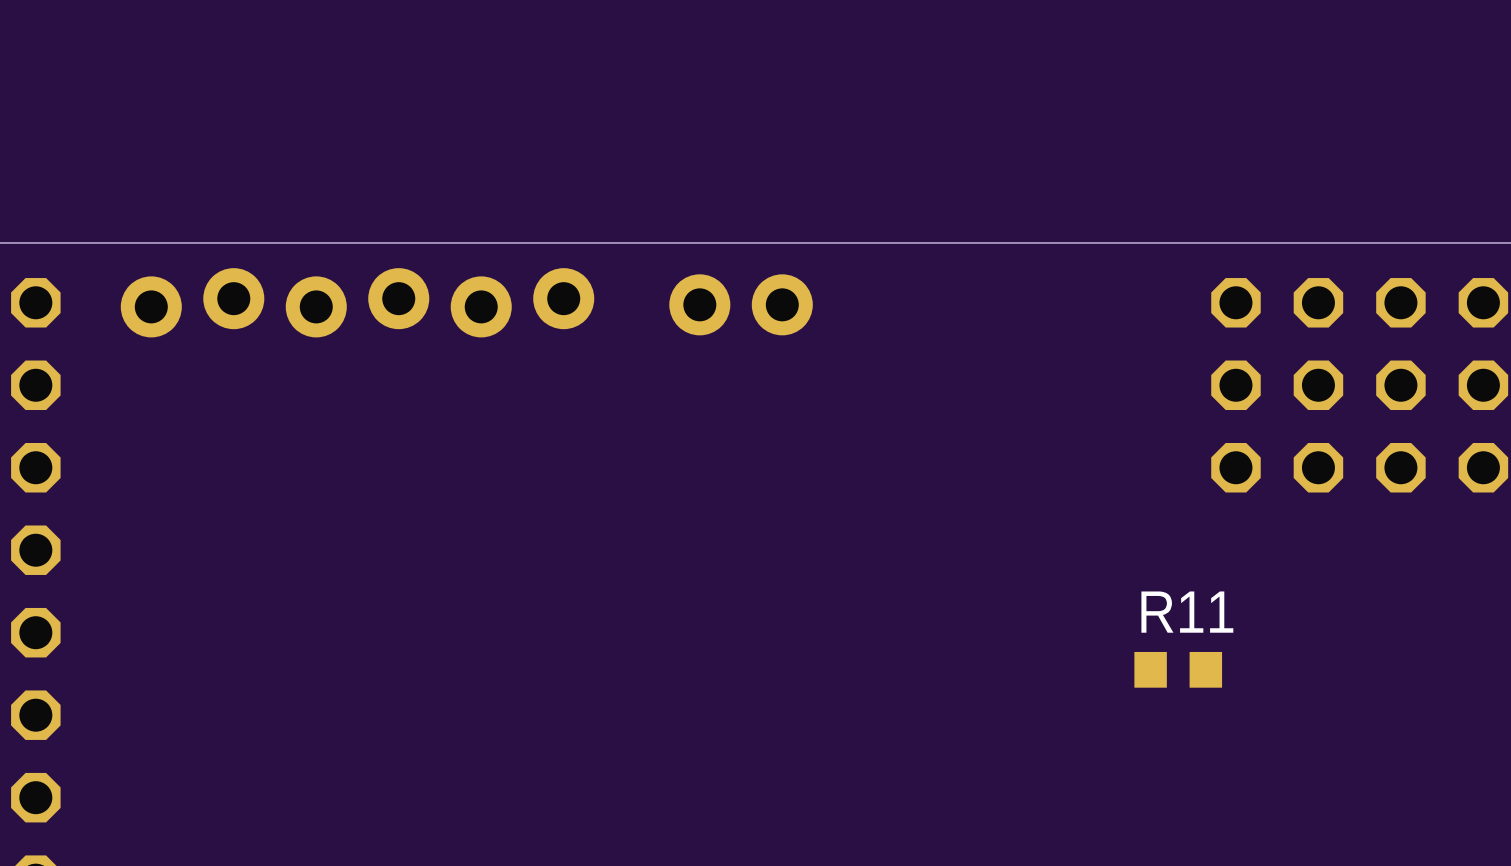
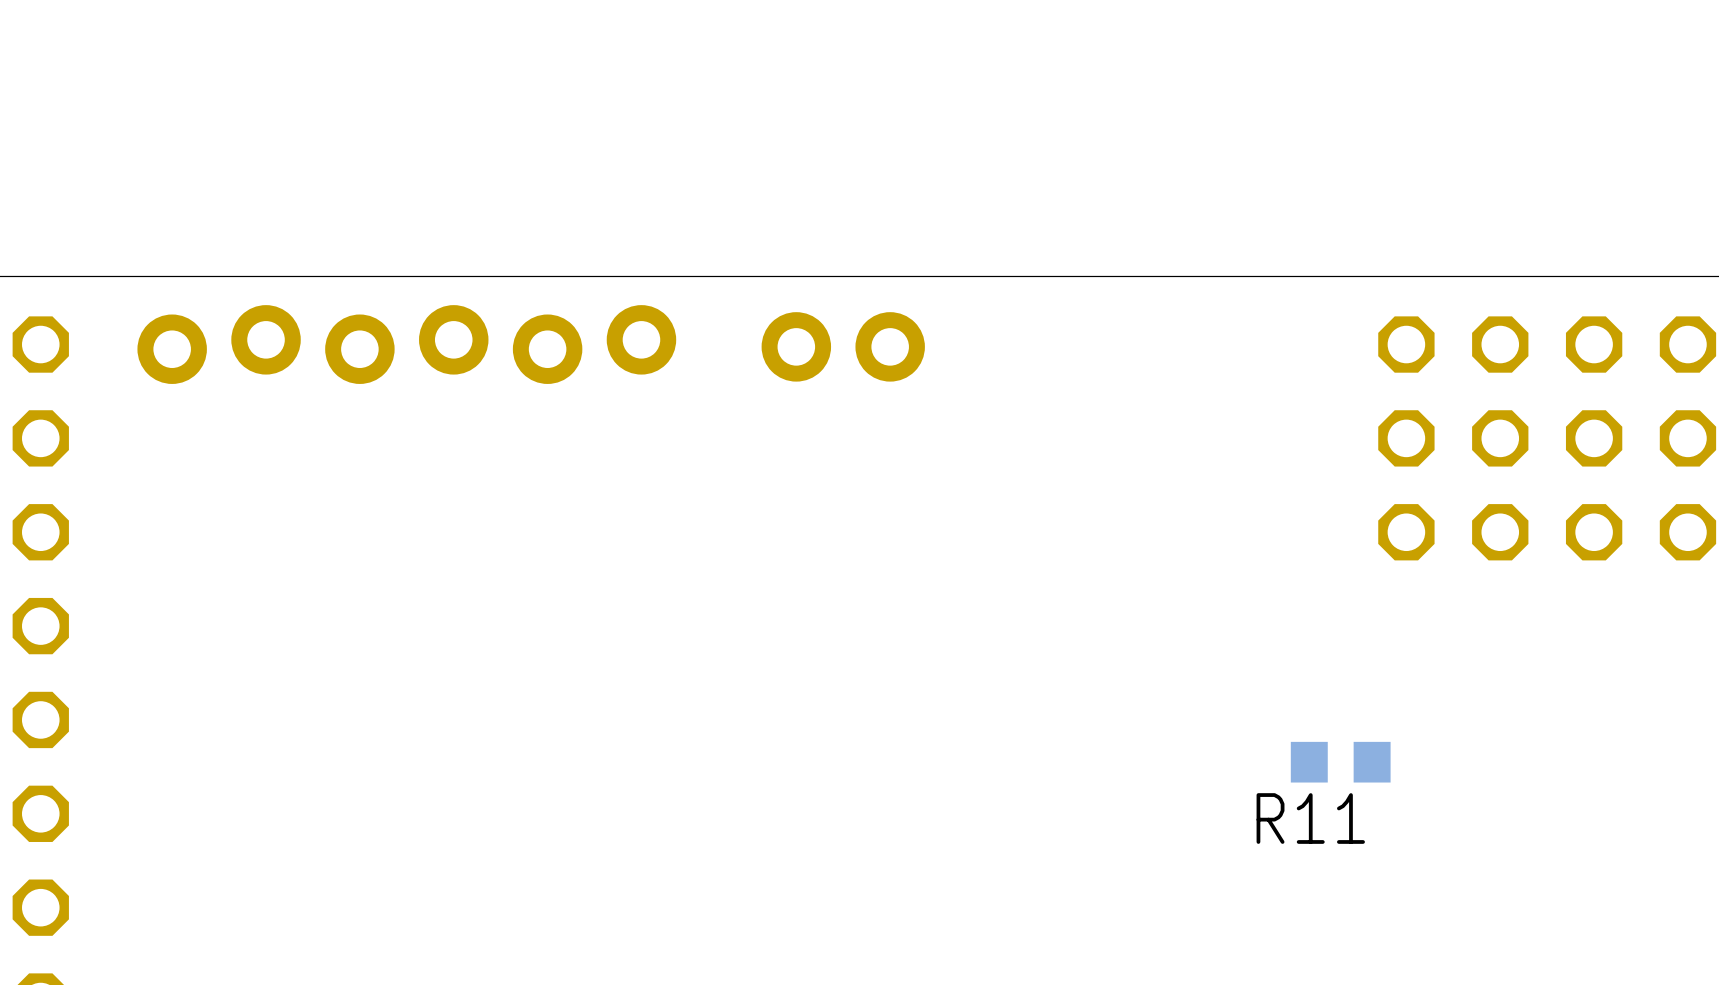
R11 name position: R11 (1187, 612) -> R11 (1310, 818)

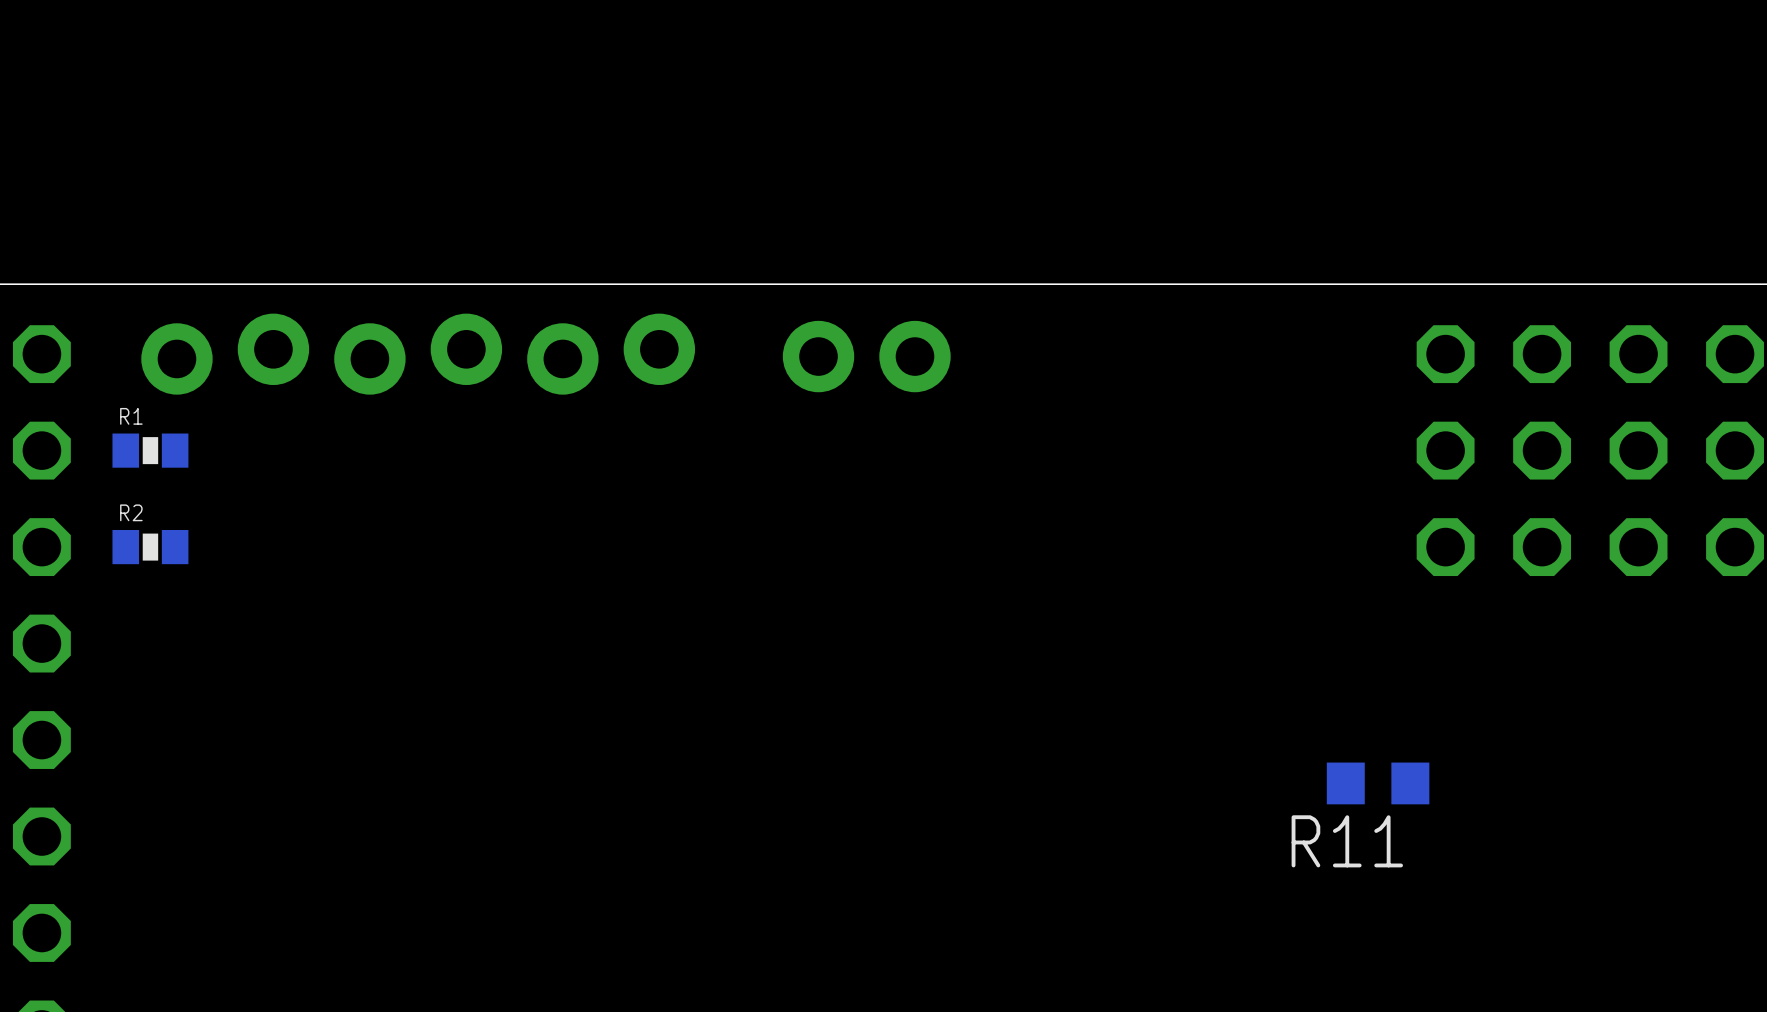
R1: none -> (150, 450)
R2: none -> (150, 547)

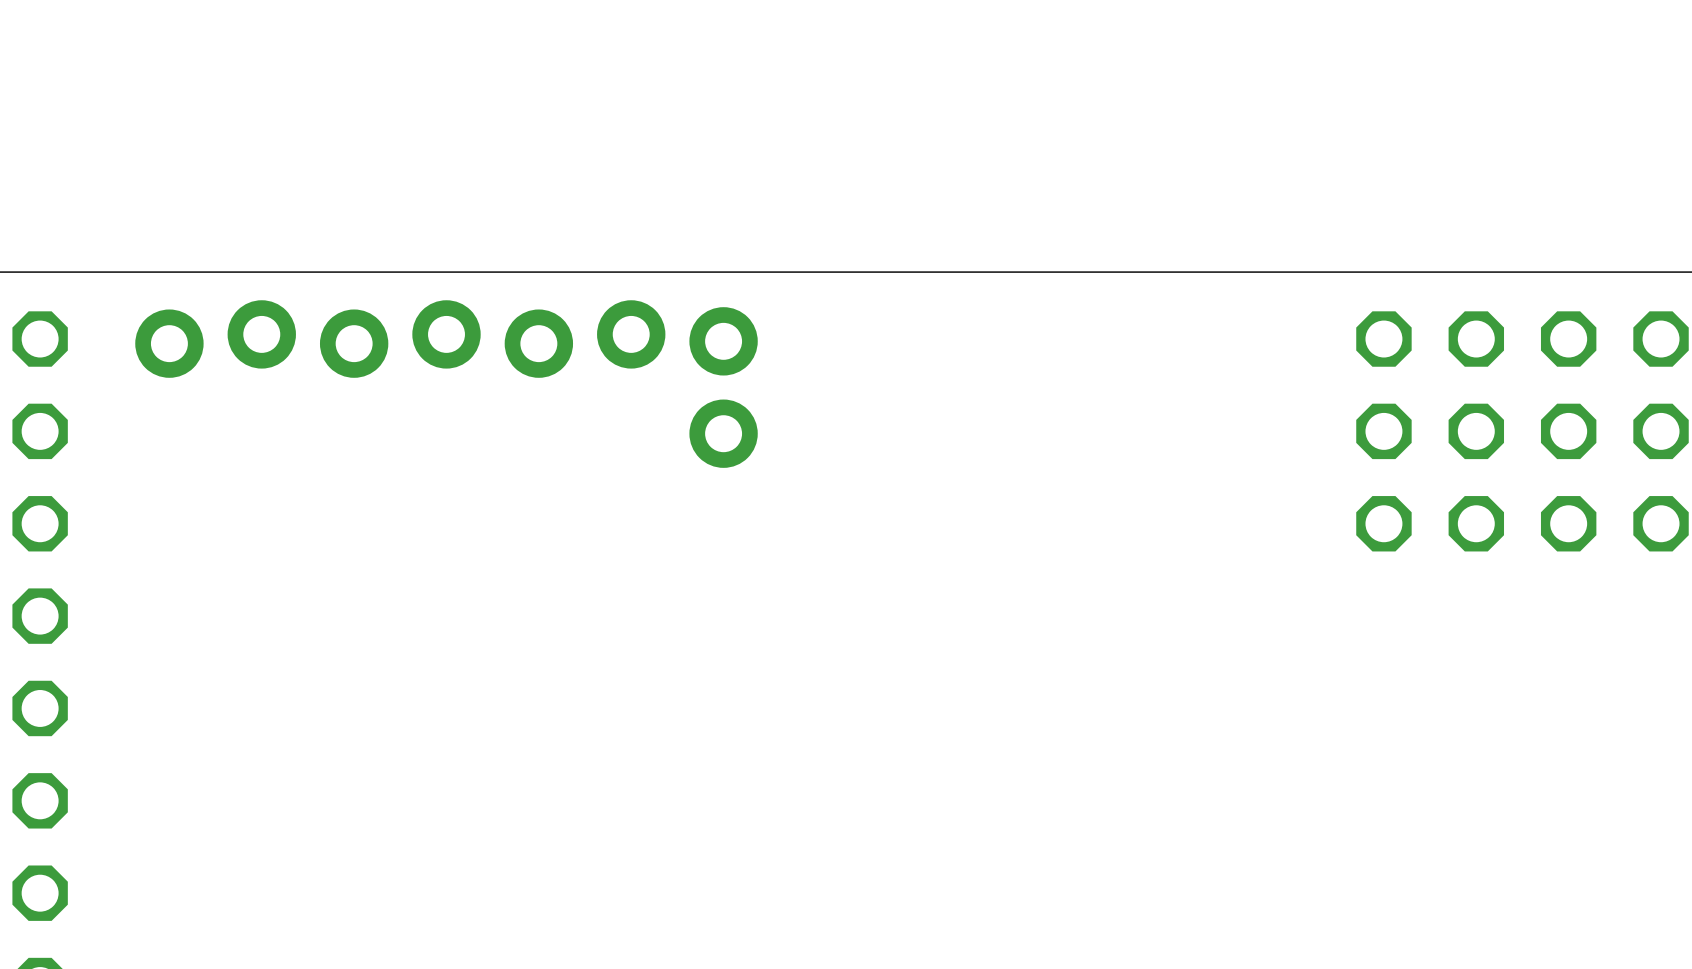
part rotation: 0° (866, 356) -> 90° clockwise (723, 387)
part position: (866, 356) -> (723, 387)
R1: (150, 450) -> none
R2: (150, 547) -> none
R11: (1378, 783) -> none

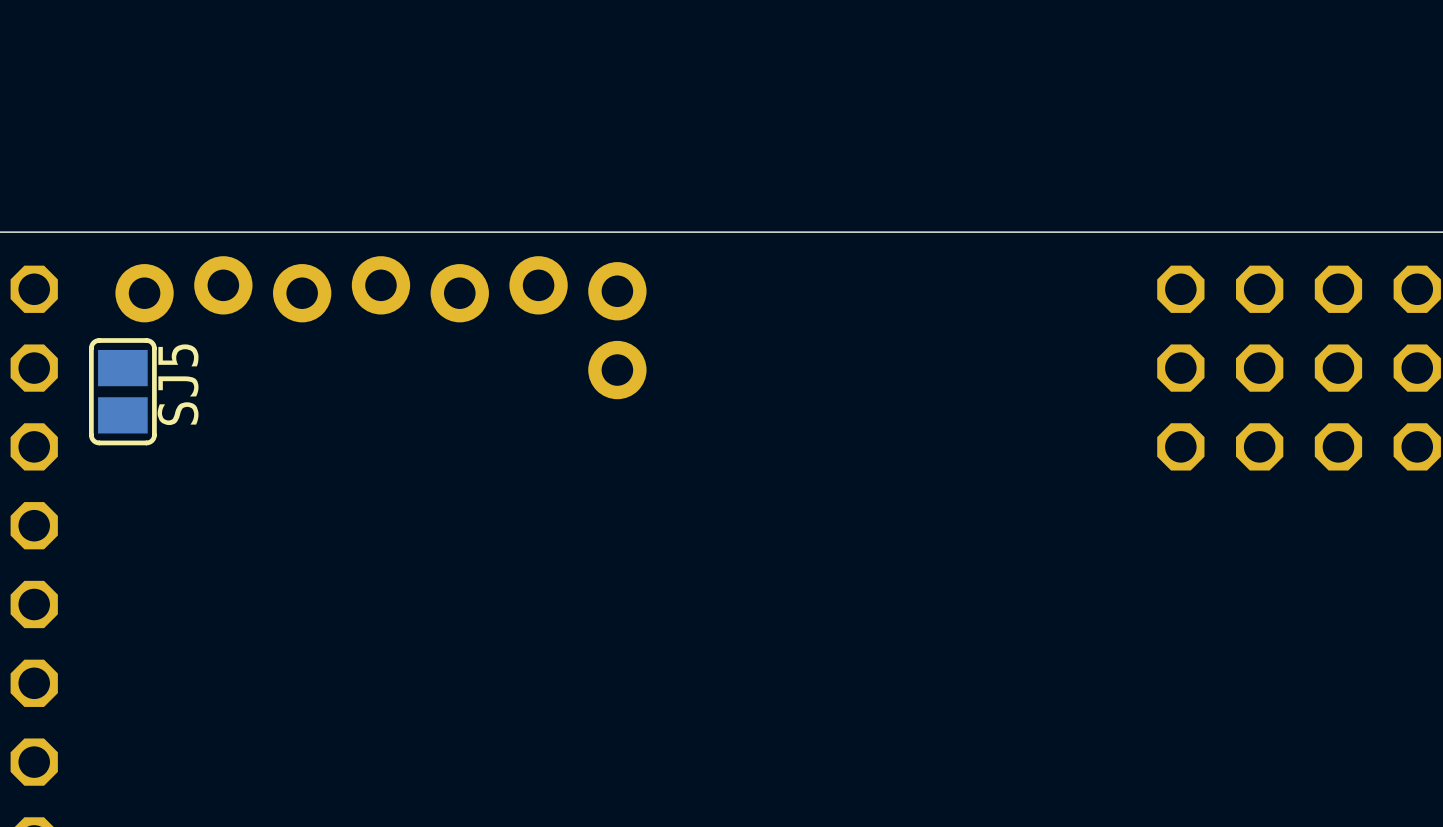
SJ5: none -> (122, 391)

